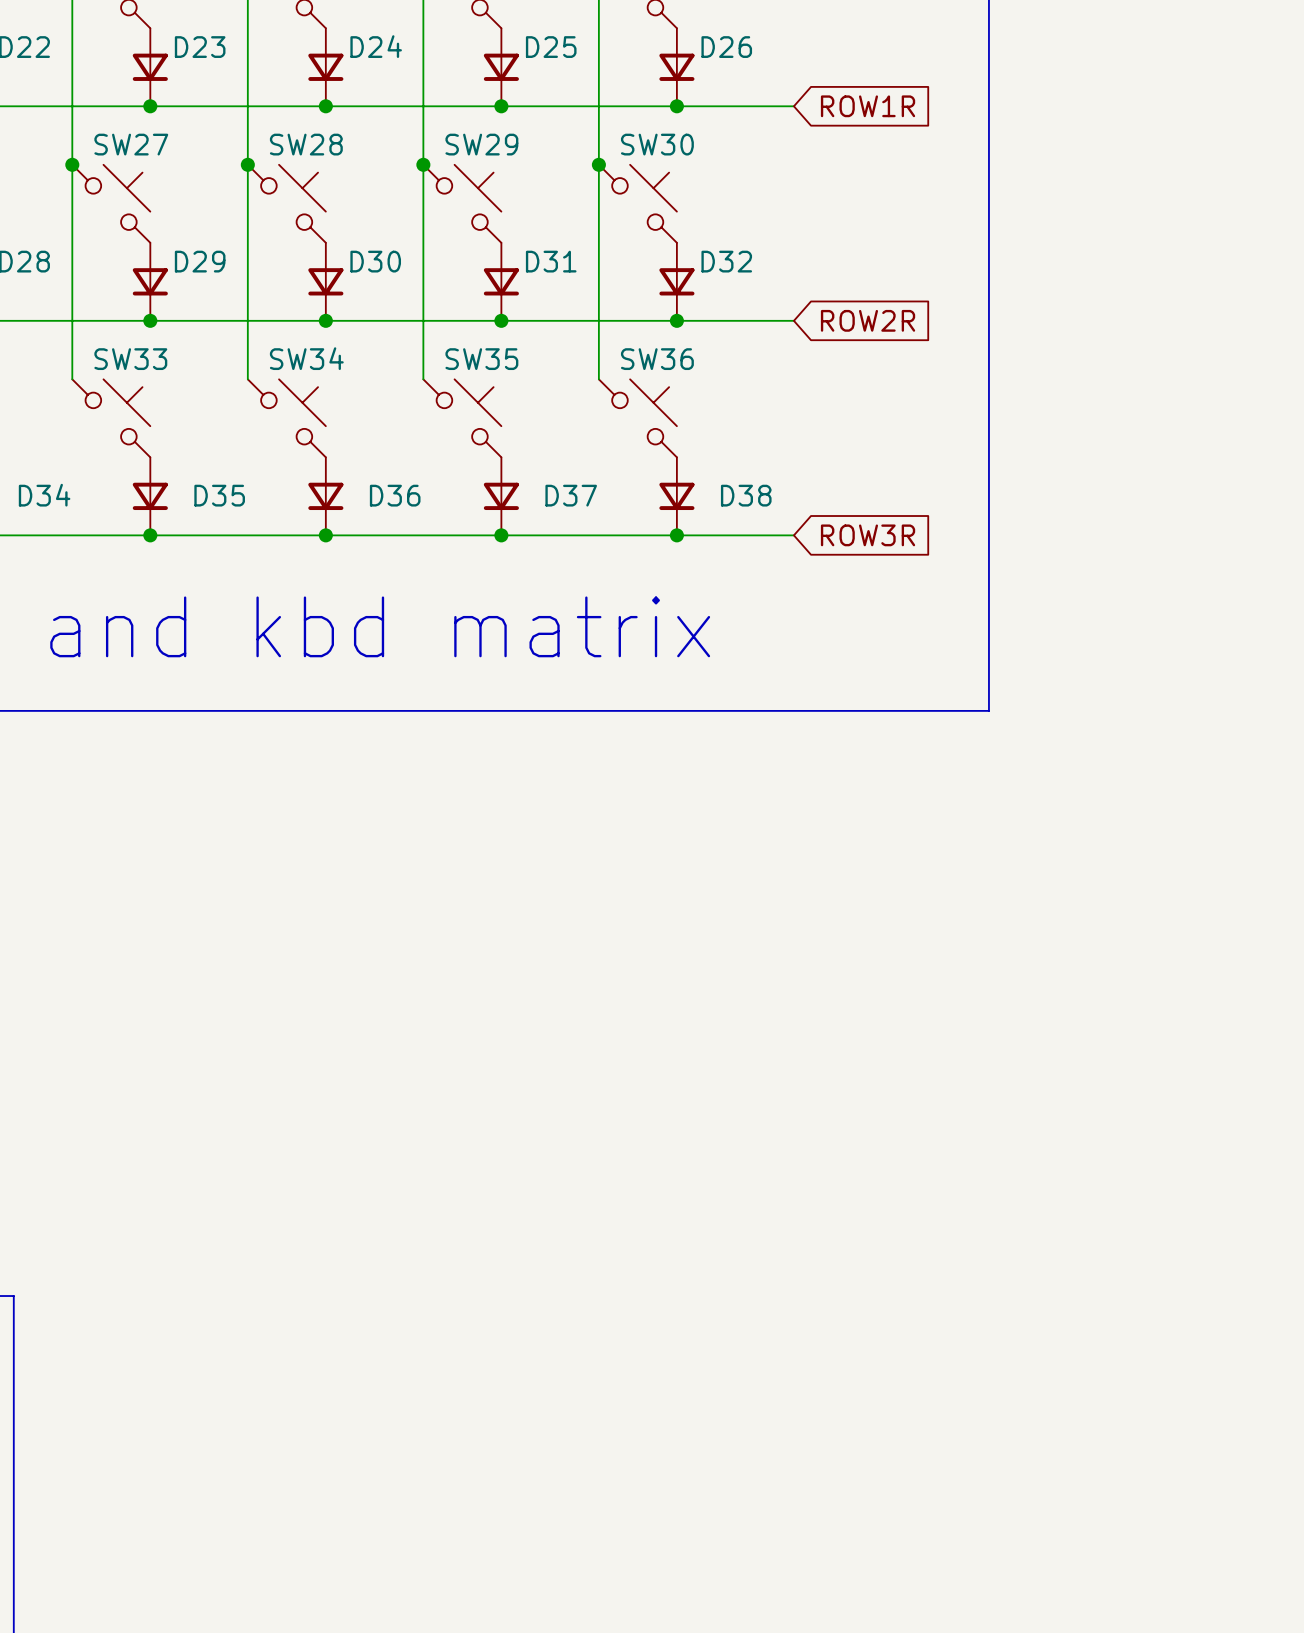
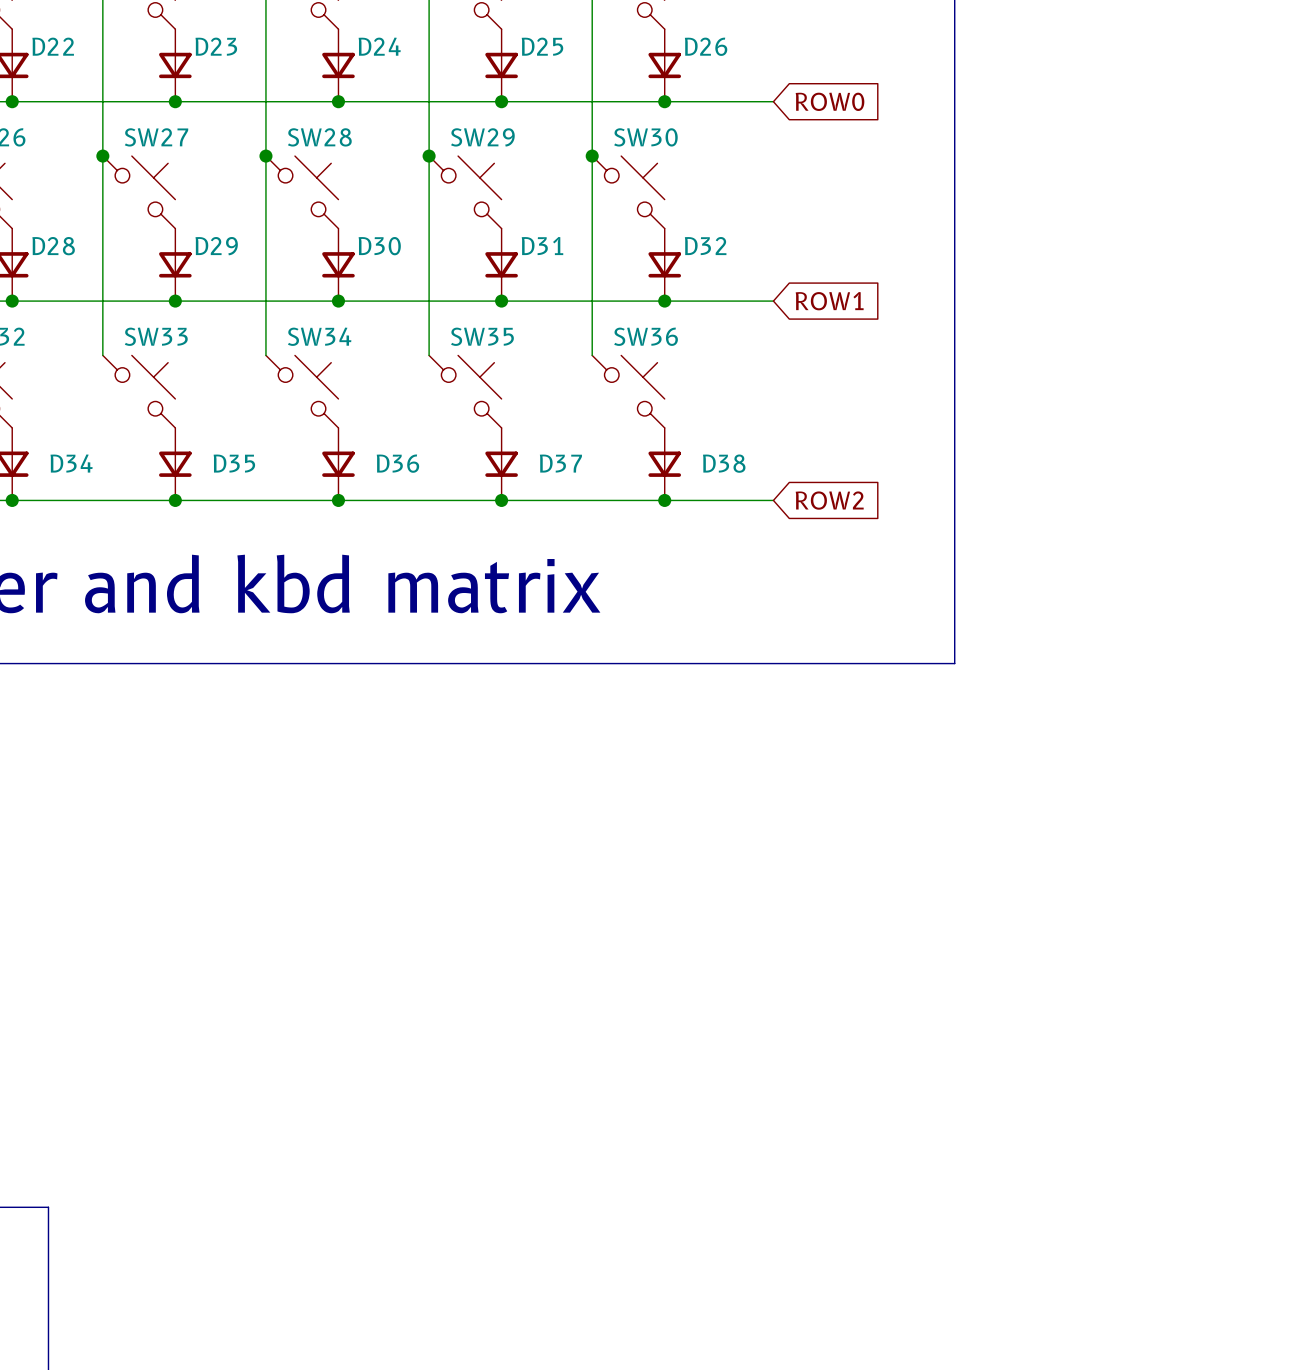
global label: ROW1R (868, 106) -> ROW0 (830, 101)
global label: ROW2R (868, 320) -> ROW1 (829, 301)
global label: ROW3R (868, 535) -> ROW2 (829, 500)

